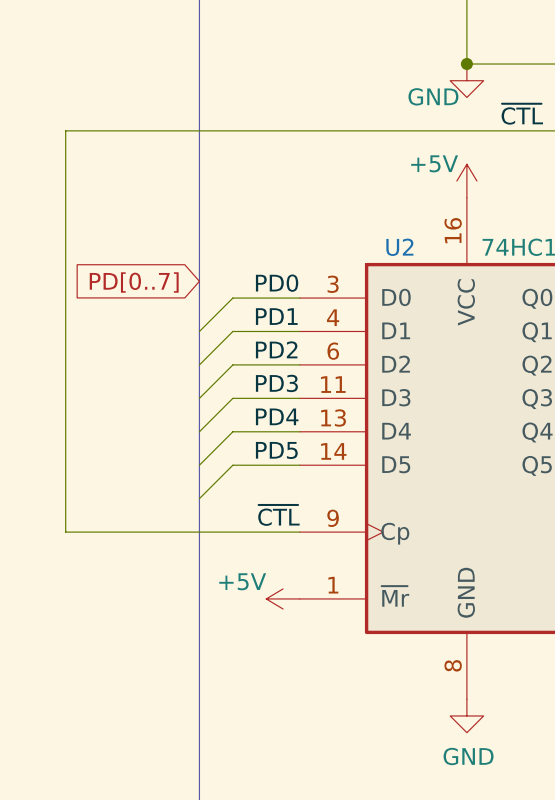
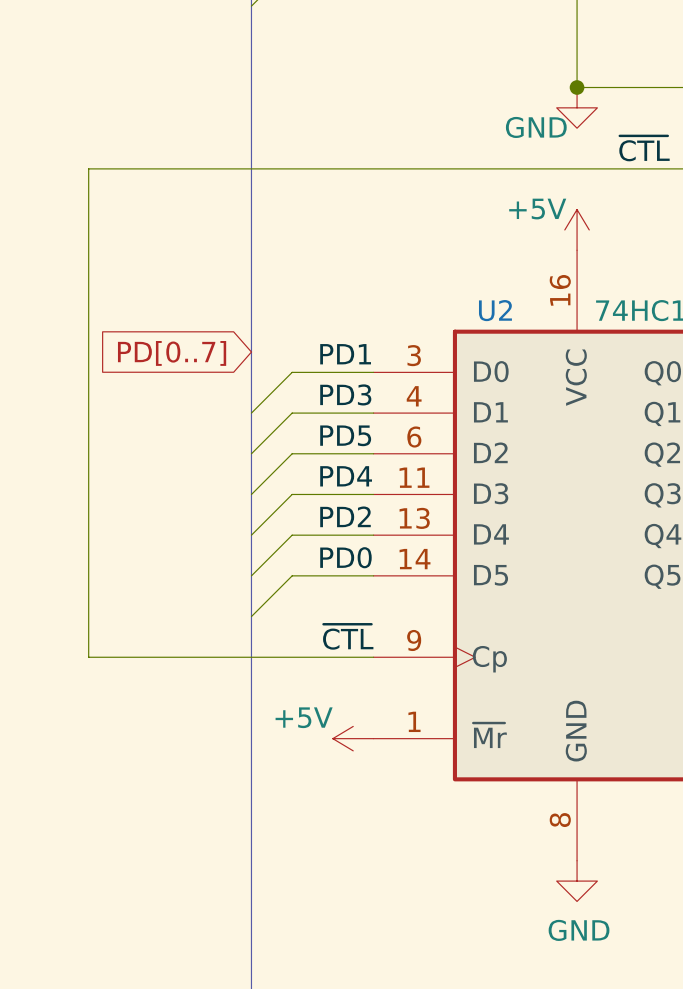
label: PD0 (277, 283) -> PD1 (345, 354)
label: PD1 (276, 316) -> PD3 (345, 394)
label: PD2 (276, 349) -> PD5 (345, 435)
label: PD3 (276, 383) -> PD4 (346, 476)
label: PD4 (277, 416) -> PD2 (345, 516)
label: PD5 (276, 450) -> PD0 (345, 557)

